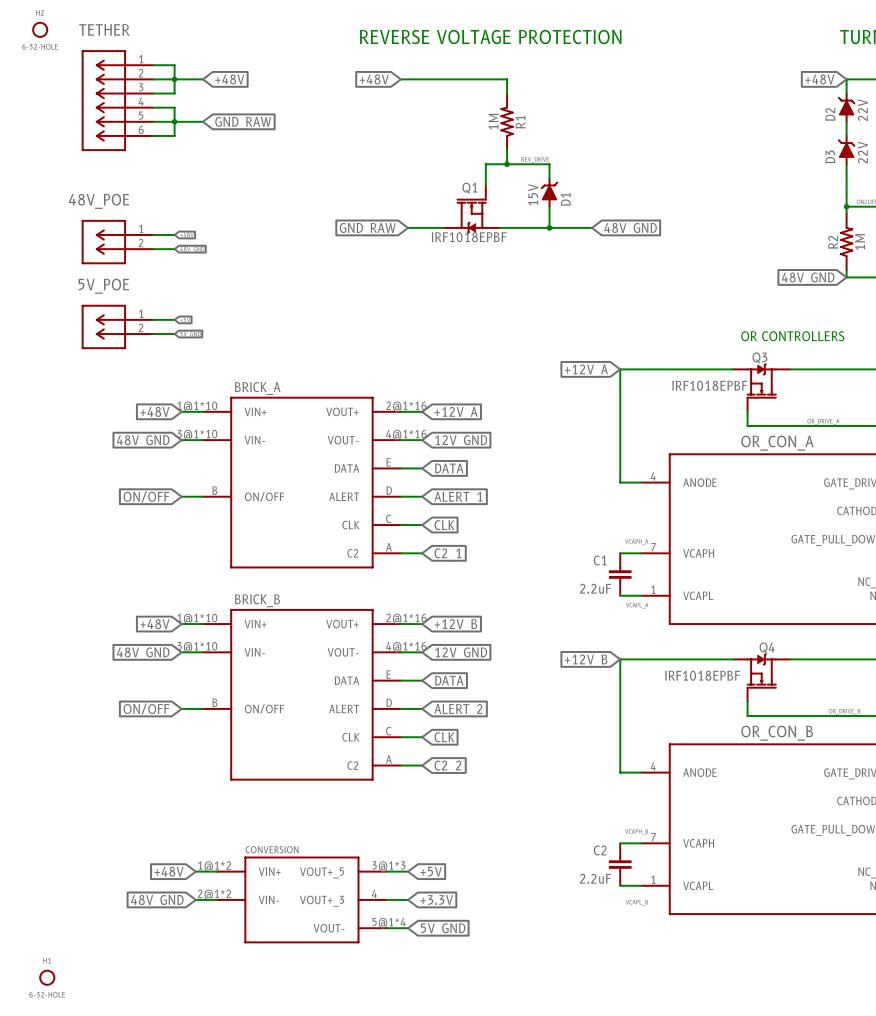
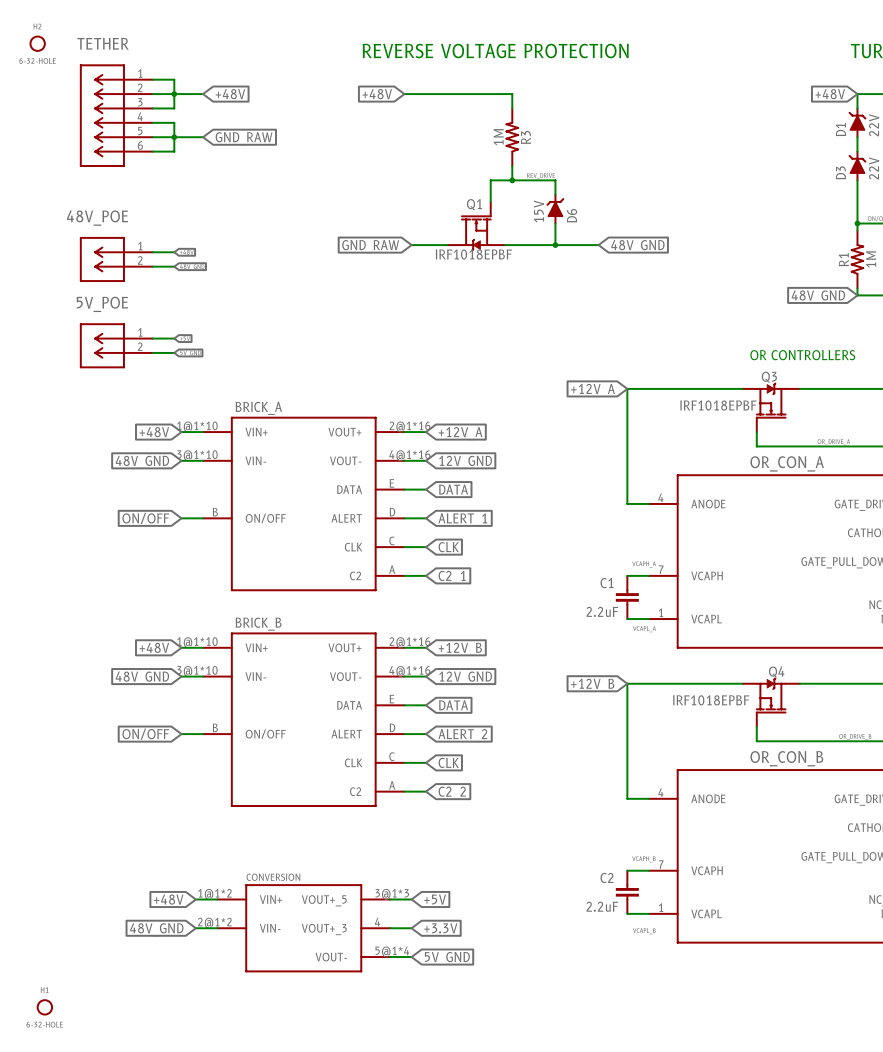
D2 name: D2 (830, 114) -> D1 (840, 129)
R1 name: R1 (520, 122) -> R3 (525, 137)
D1 name: D1 (565, 199) -> D6 (572, 215)
R2 name: R2 (833, 242) -> R1 (843, 259)

